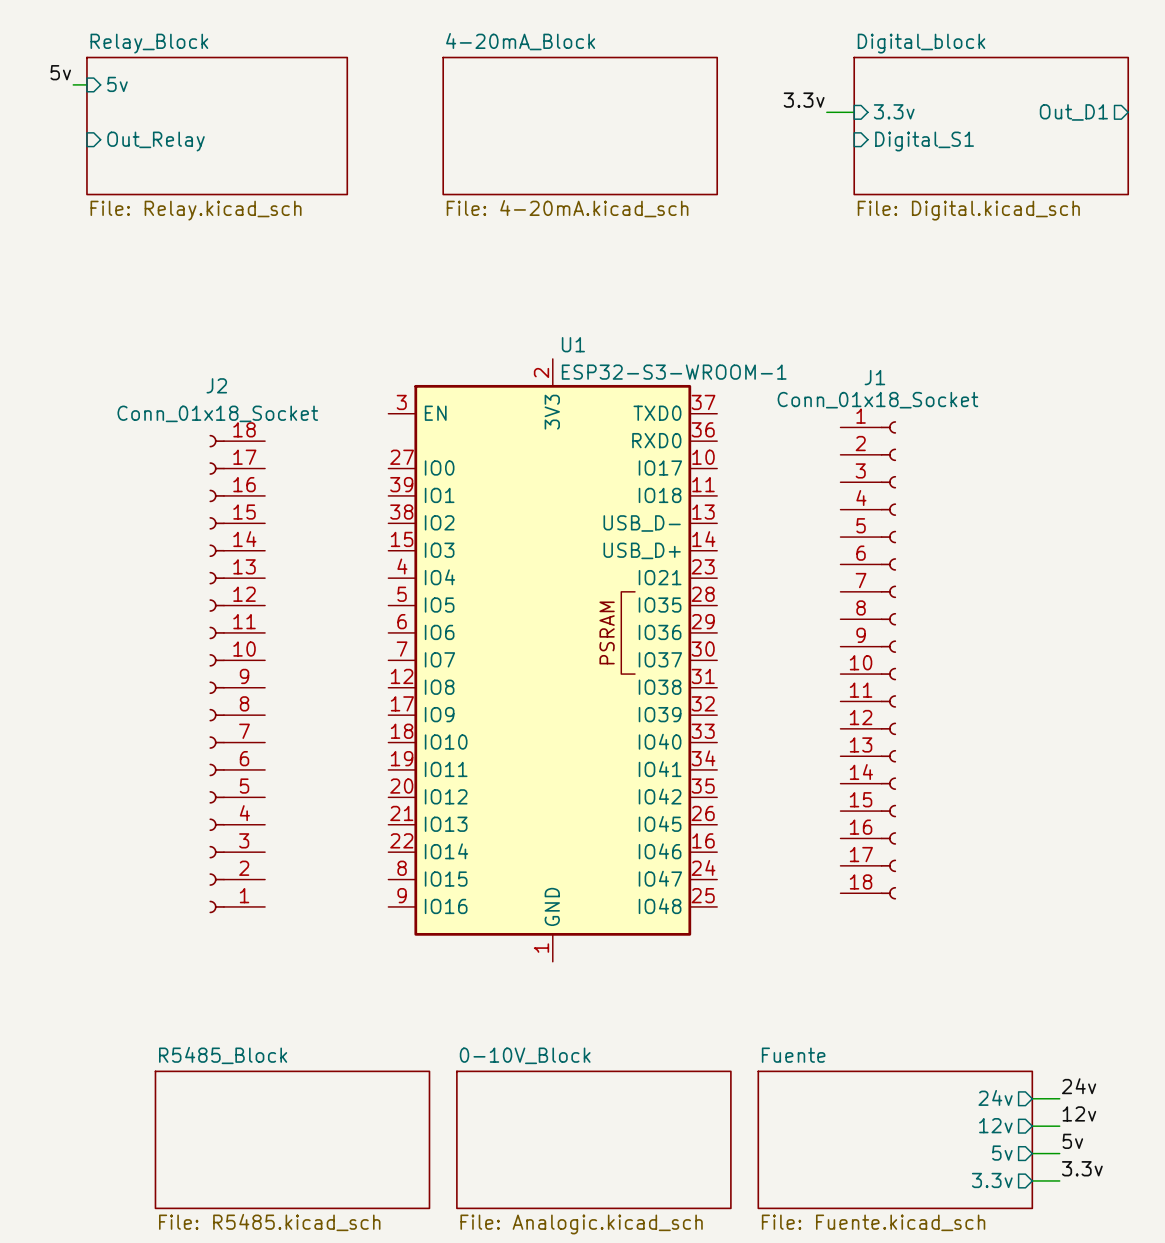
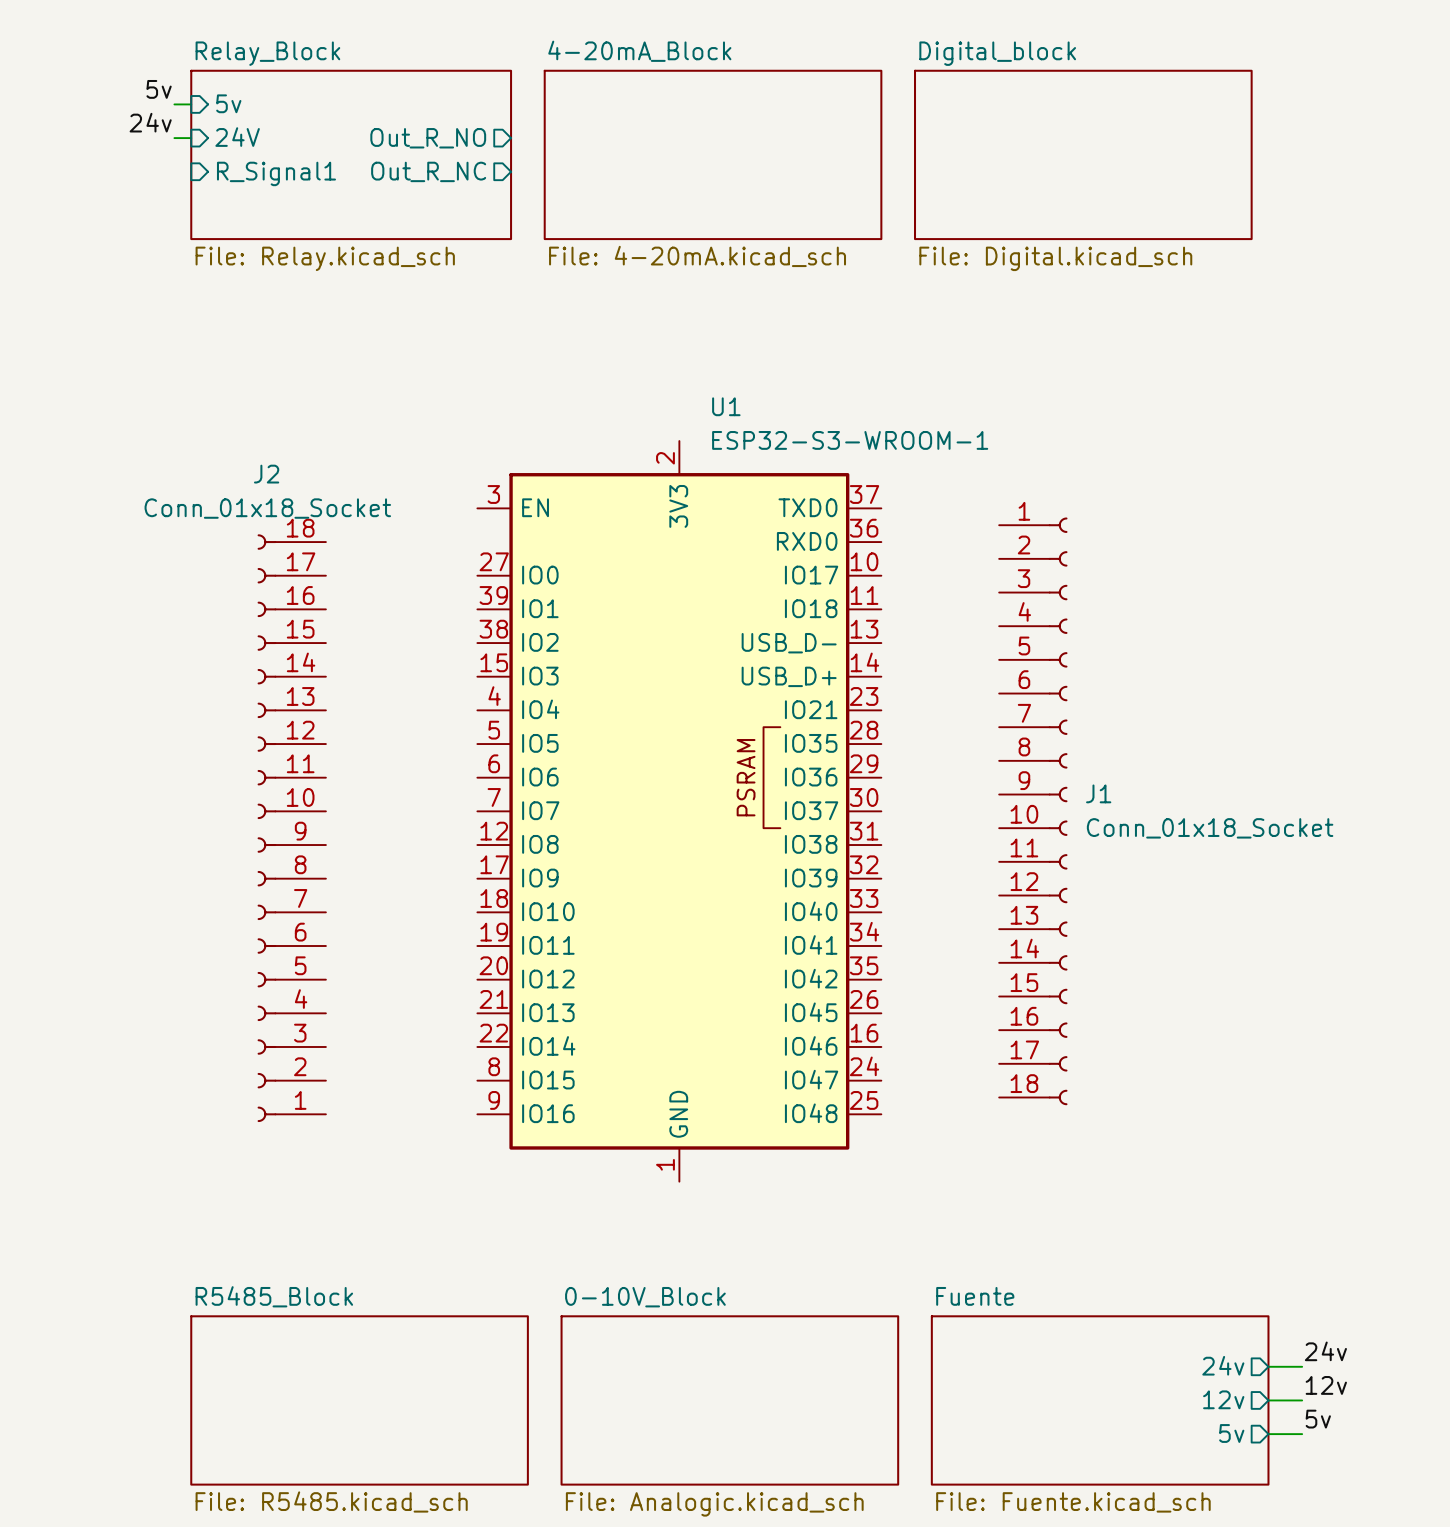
label position: 5v (60, 72) -> 5v (159, 89)
wire: (73, 84) (86, 84) -> (174, 104) (191, 104)
sheet pin position: 5v (117, 84) -> 5v (228, 103)
label: none -> 24v (150, 122)
label: 3.3v (804, 100) -> none
sheet pin: none -> 24V (237, 137)
sheet pin: 3.3v (894, 111) -> none
wire: none -> (174, 138) (191, 138)
sheet pin: none -> Out_R_NO (428, 138)
wire: (826, 112) (854, 112) -> none
sheet pin: Out_D1 (1073, 112) -> none
sheet Relay_Block position: (217, 126) -> (351, 154)
sheet Digital_block position: (991, 126) -> (1083, 154)
sheet pin: none -> Out_R_NC (428, 171)
sheet pin: Out_Relay (156, 141) -> none
sheet pin: none -> R_Signal1 (276, 173)
sheet pin: Digital_S1 (924, 141) -> none
U1 name position: U1 (573, 344) -> U1 (726, 406)
U1 value position: ESP32-S3-WROOM-1 (674, 372) -> ESP32-S3-WROOM-1 (850, 440)
J1 name position: J1 (874, 377) -> J1 (1098, 793)
J1 value position: Conn_01x18_Socket (877, 400) -> Conn_01x18_Socket (1210, 828)
J1 position: (868, 660) -> (1033, 811)
label position: 24v (1079, 1086) -> 24v (1325, 1351)
sheet pin position: 24v (995, 1097) -> 24v (1223, 1365)
wire: (1032, 1098) (1059, 1098) -> (1268, 1400) (1302, 1400)
label position: 12v (1079, 1113) -> 12v (1326, 1385)
sheet pin position: 12v (995, 1125) -> 12v (1223, 1399)
wire: (1032, 1126) (1059, 1126) -> (1268, 1366) (1302, 1366)
label position: 5v (1072, 1141) -> 5v (1318, 1419)
sheet pin position: 5v (1002, 1153) -> 5v (1231, 1433)
wire: (1032, 1153) (1059, 1153) -> (1268, 1434) (1302, 1434)
label: 3.3v (1082, 1168) -> none
sheet pin: 3.3v (992, 1180) -> none
wire: (1032, 1180) (1059, 1180) -> none

